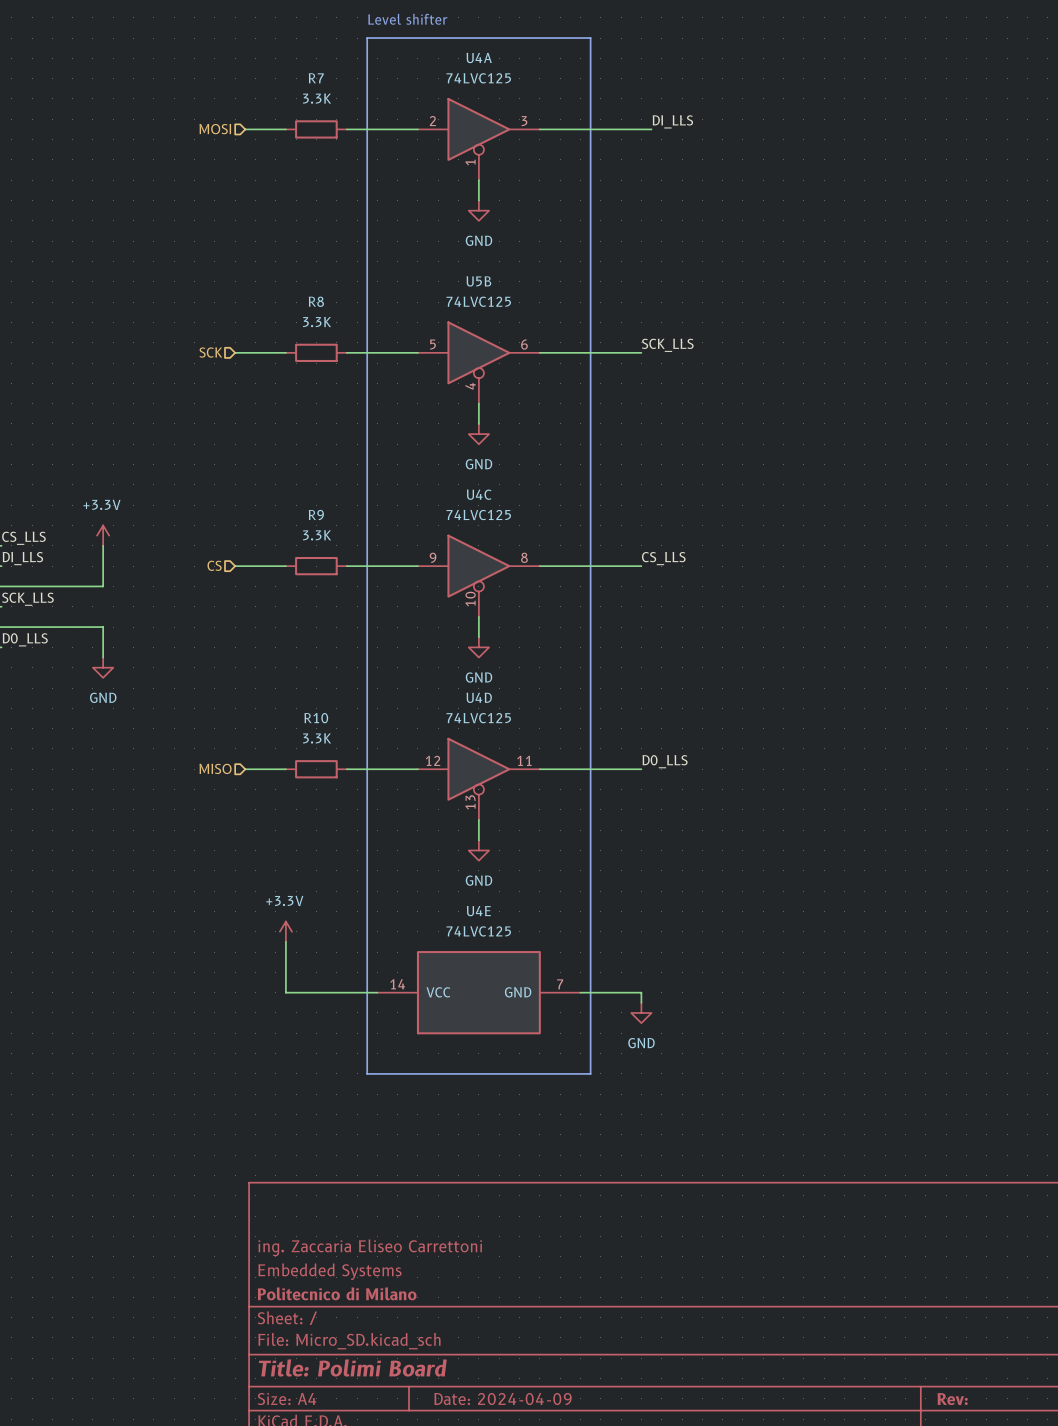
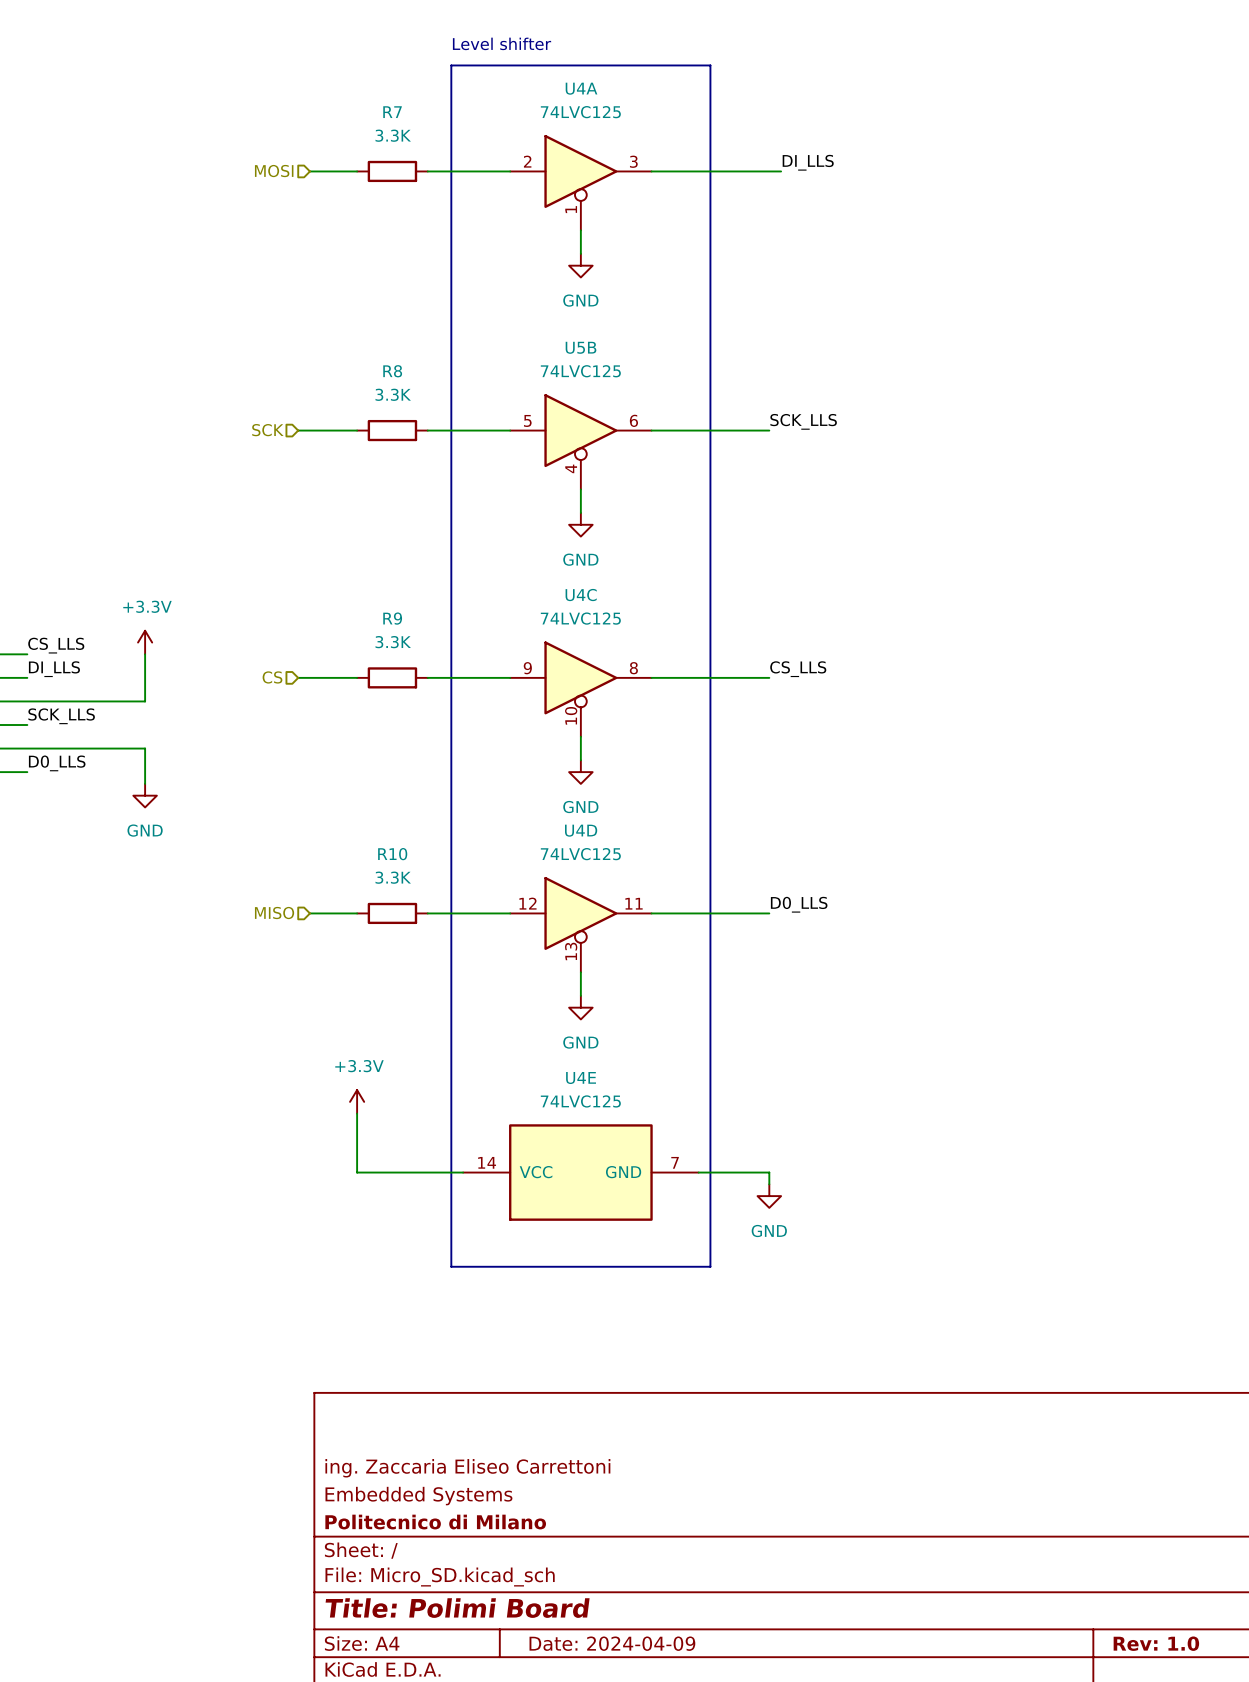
title block: Rev: (952, 1399) -> Rev: 1.0 (1156, 1643)

